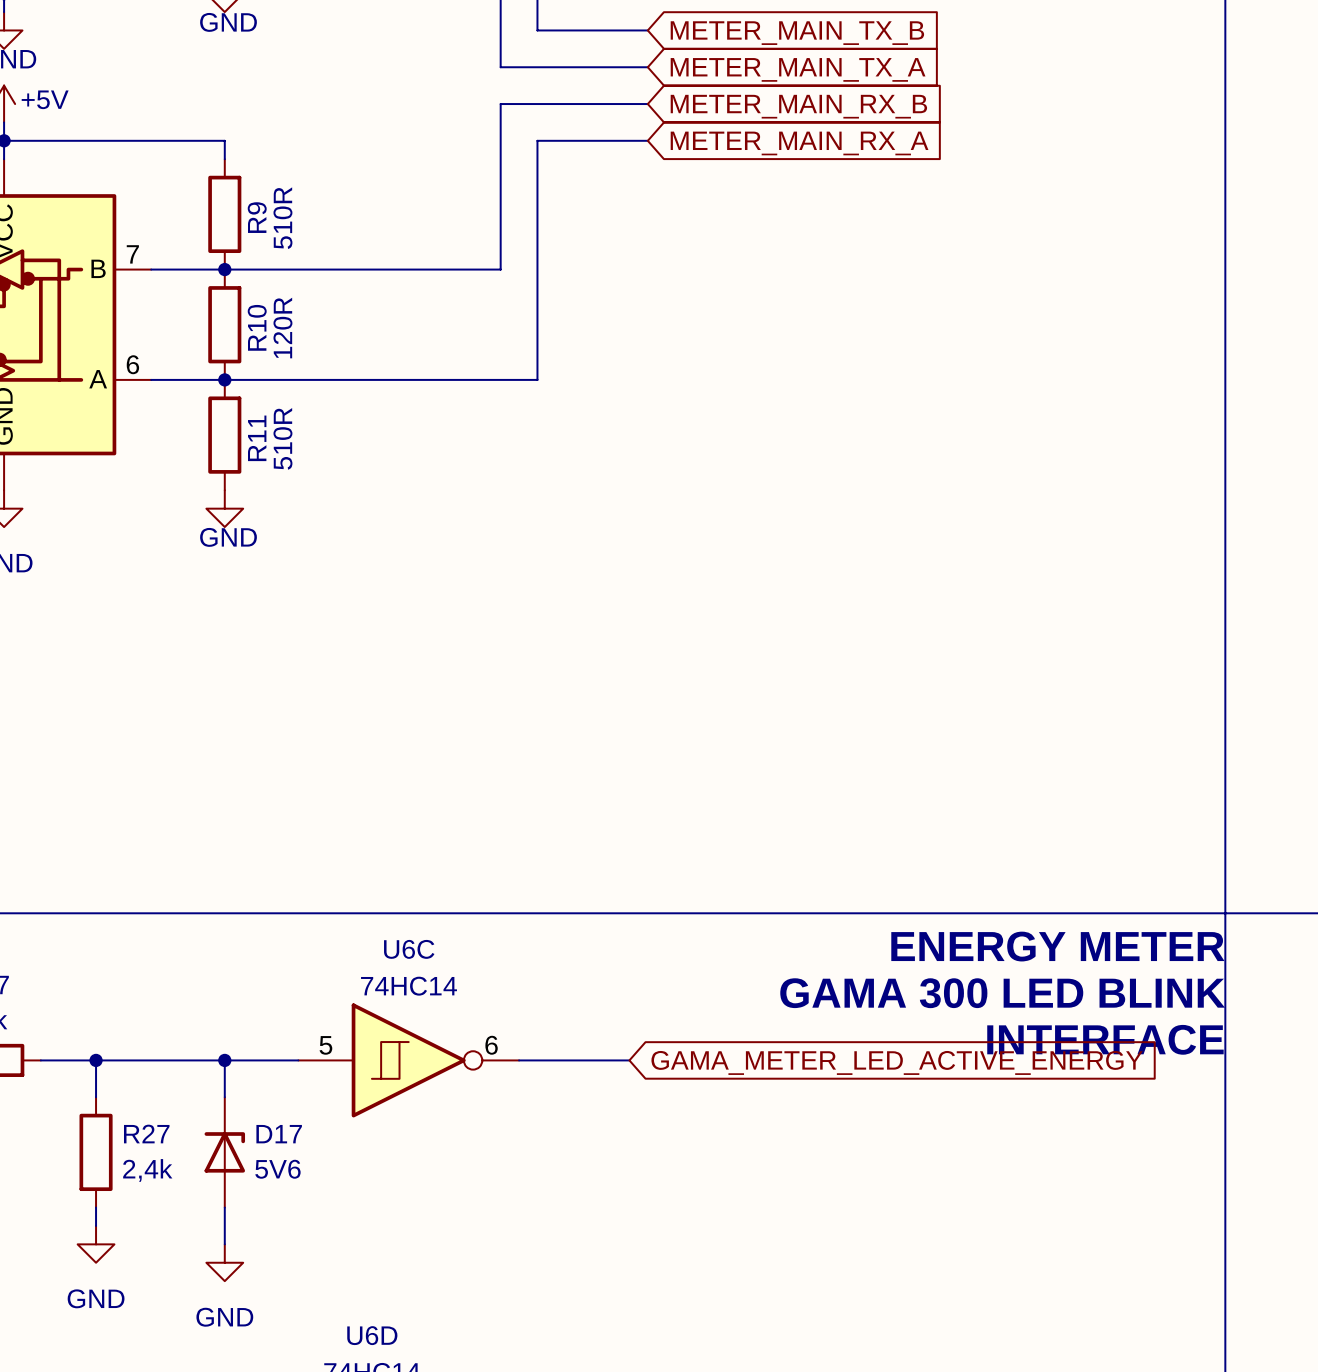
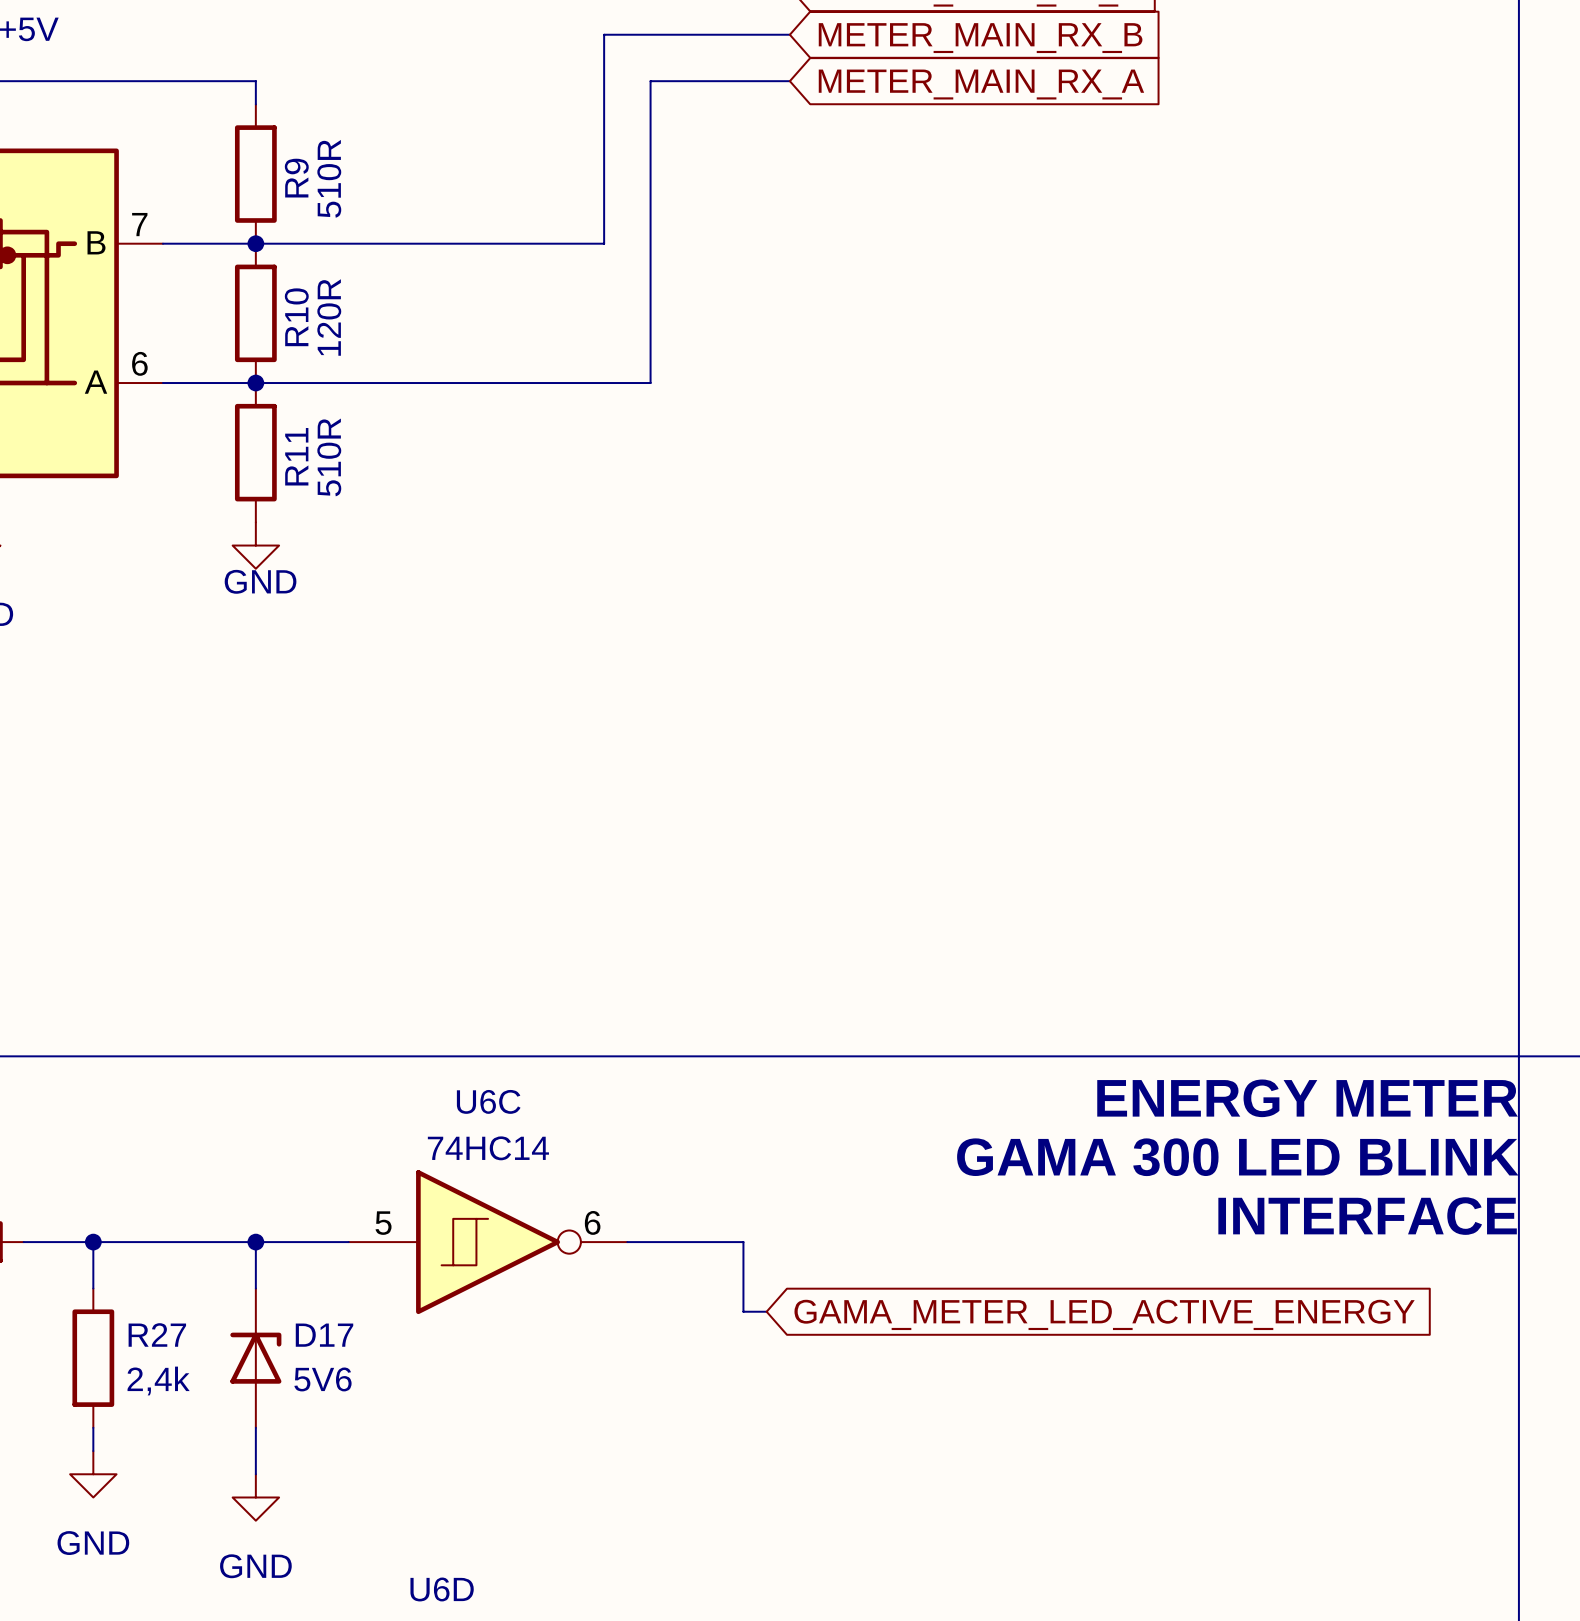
wire: (611, 1060) (629, 1060) -> (743, 1242) (743, 1311) (766, 1311)
global label position: GAMA_METER_LED_ACTIVE_ENERGY (897, 1062) -> GAMA_METER_LED_ACTIVE_ENERGY (1104, 1314)

